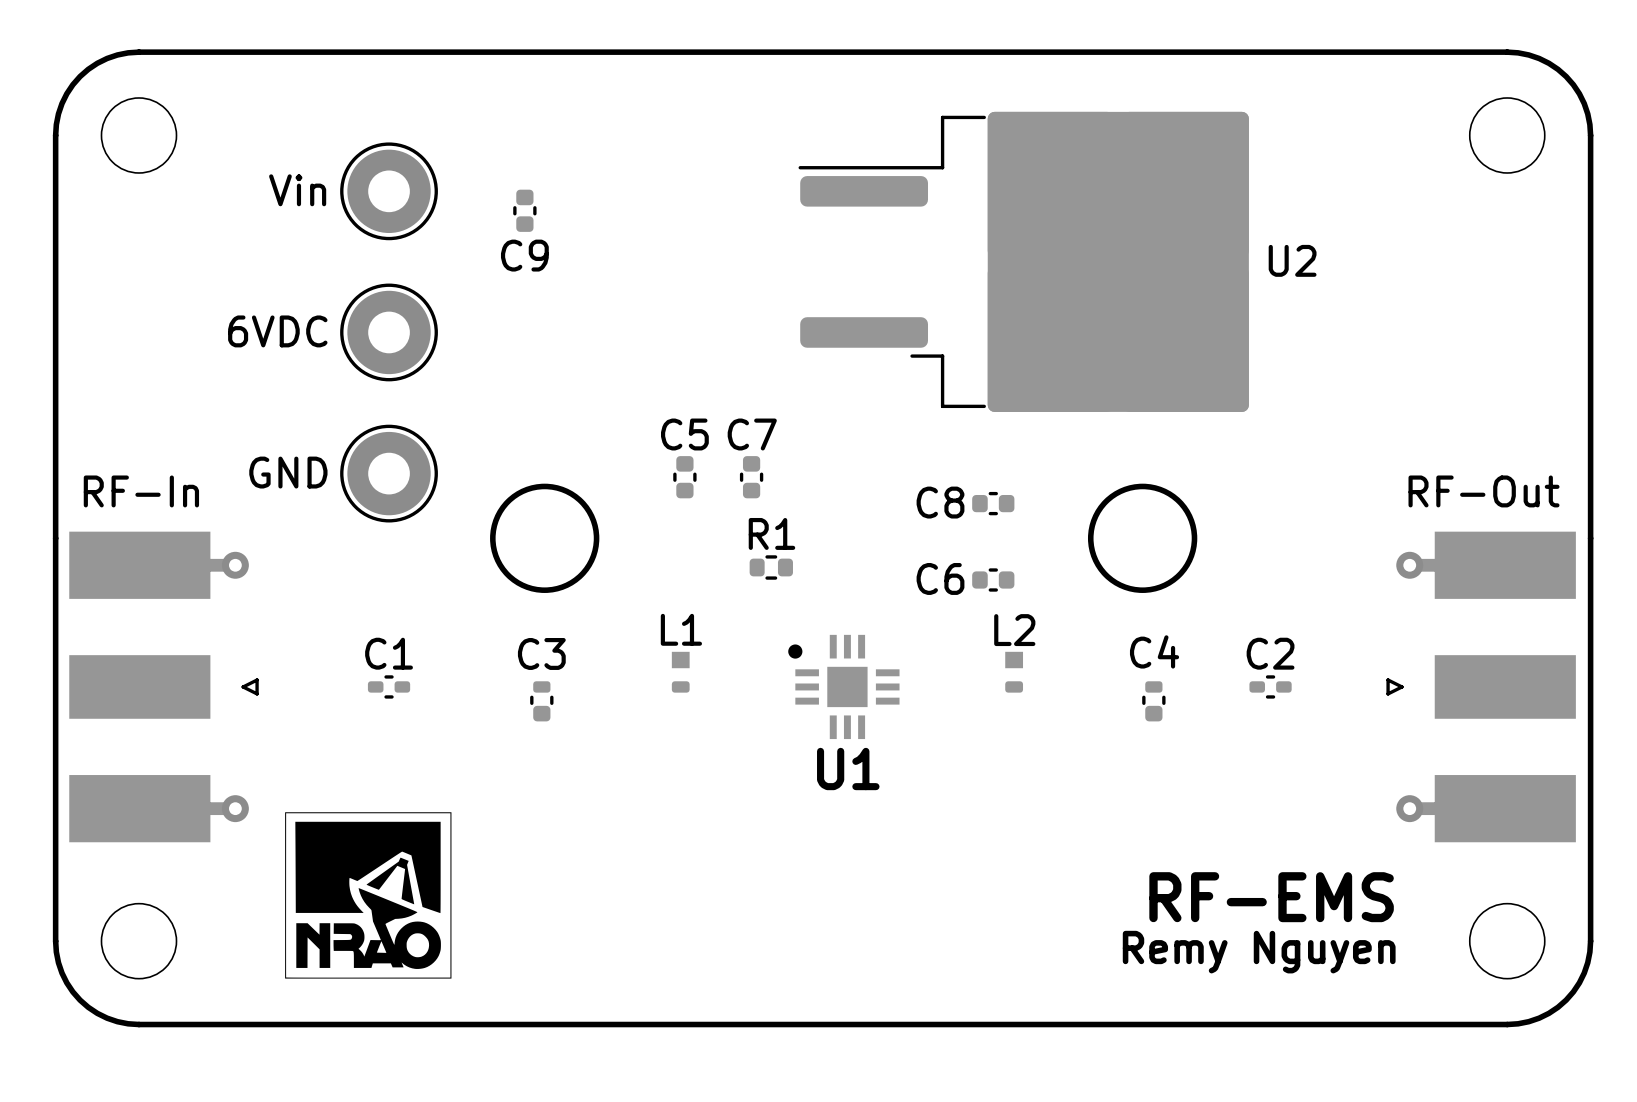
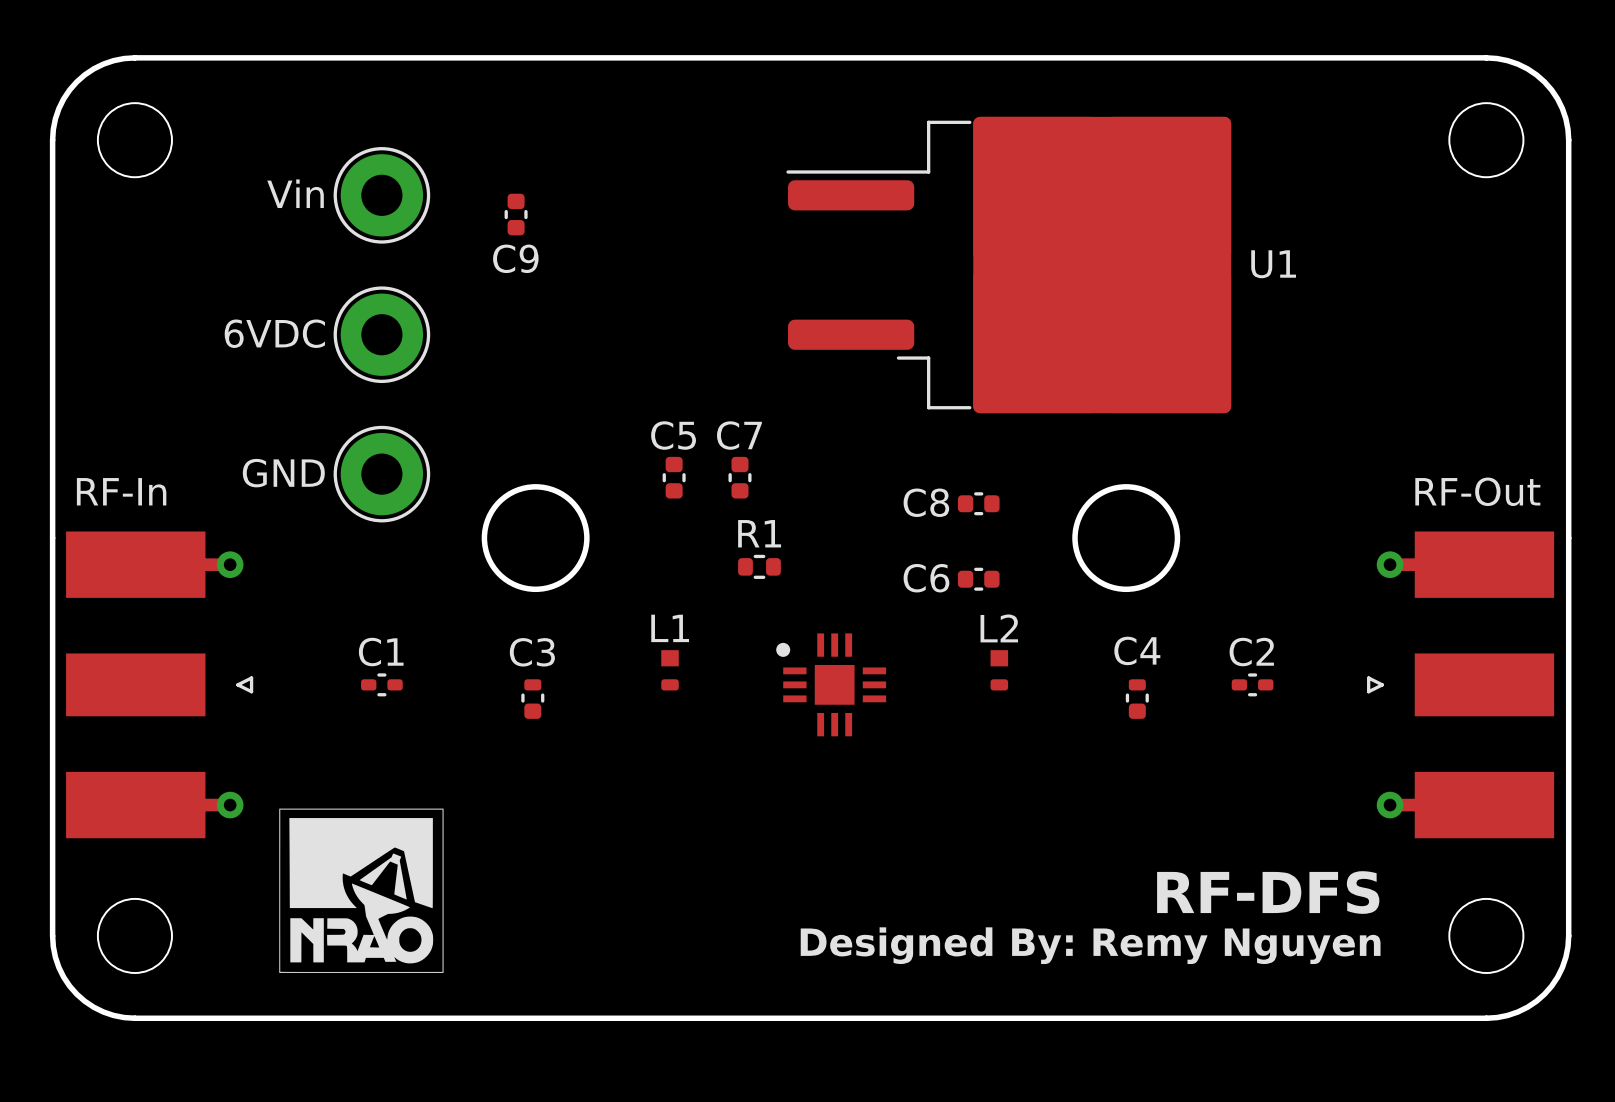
U2 name: U2 (1292, 260) -> U1 (1273, 264)
U1 name: U1 (848, 768) -> none
text: RF-EMS (1271, 897) -> RF-DFS (1268, 892)
text: Remy Nguyen (1259, 952) -> Designed By: Remy Nguyen (1090, 945)

